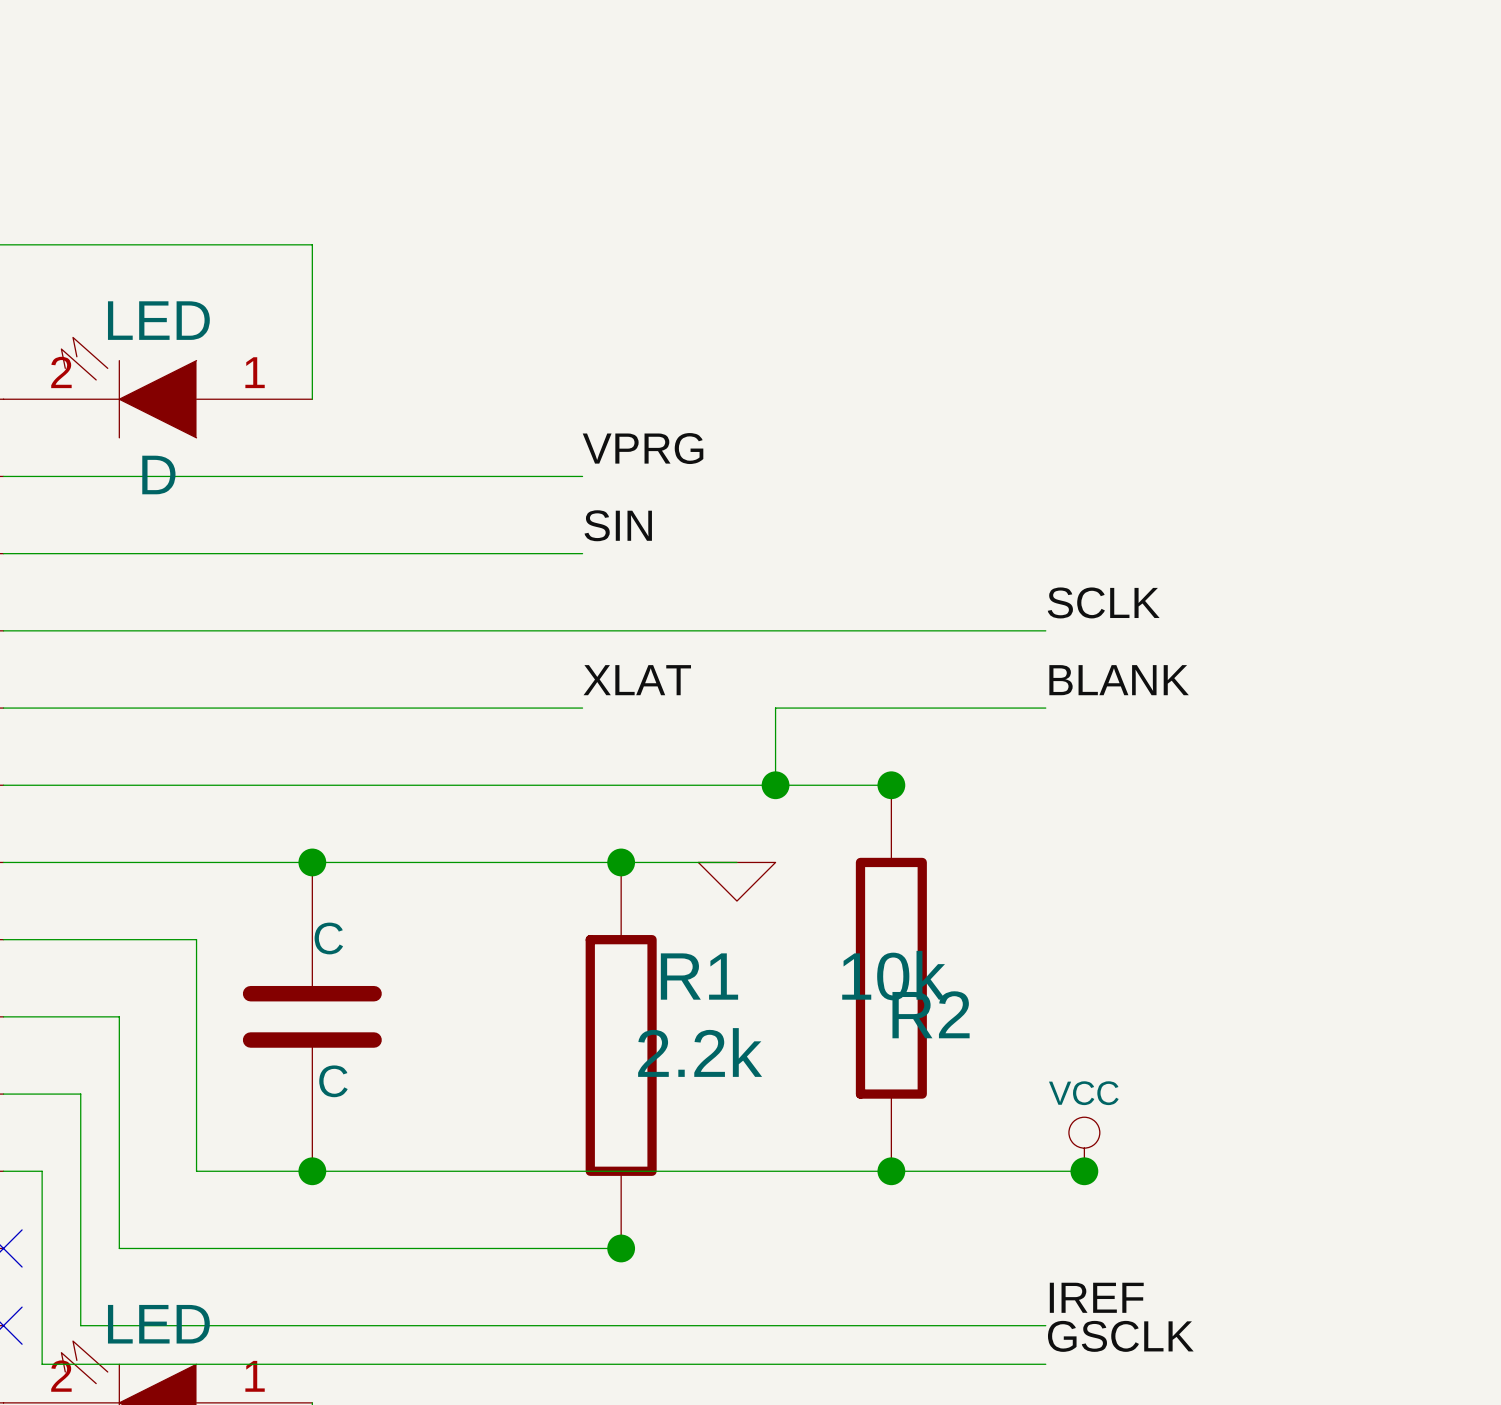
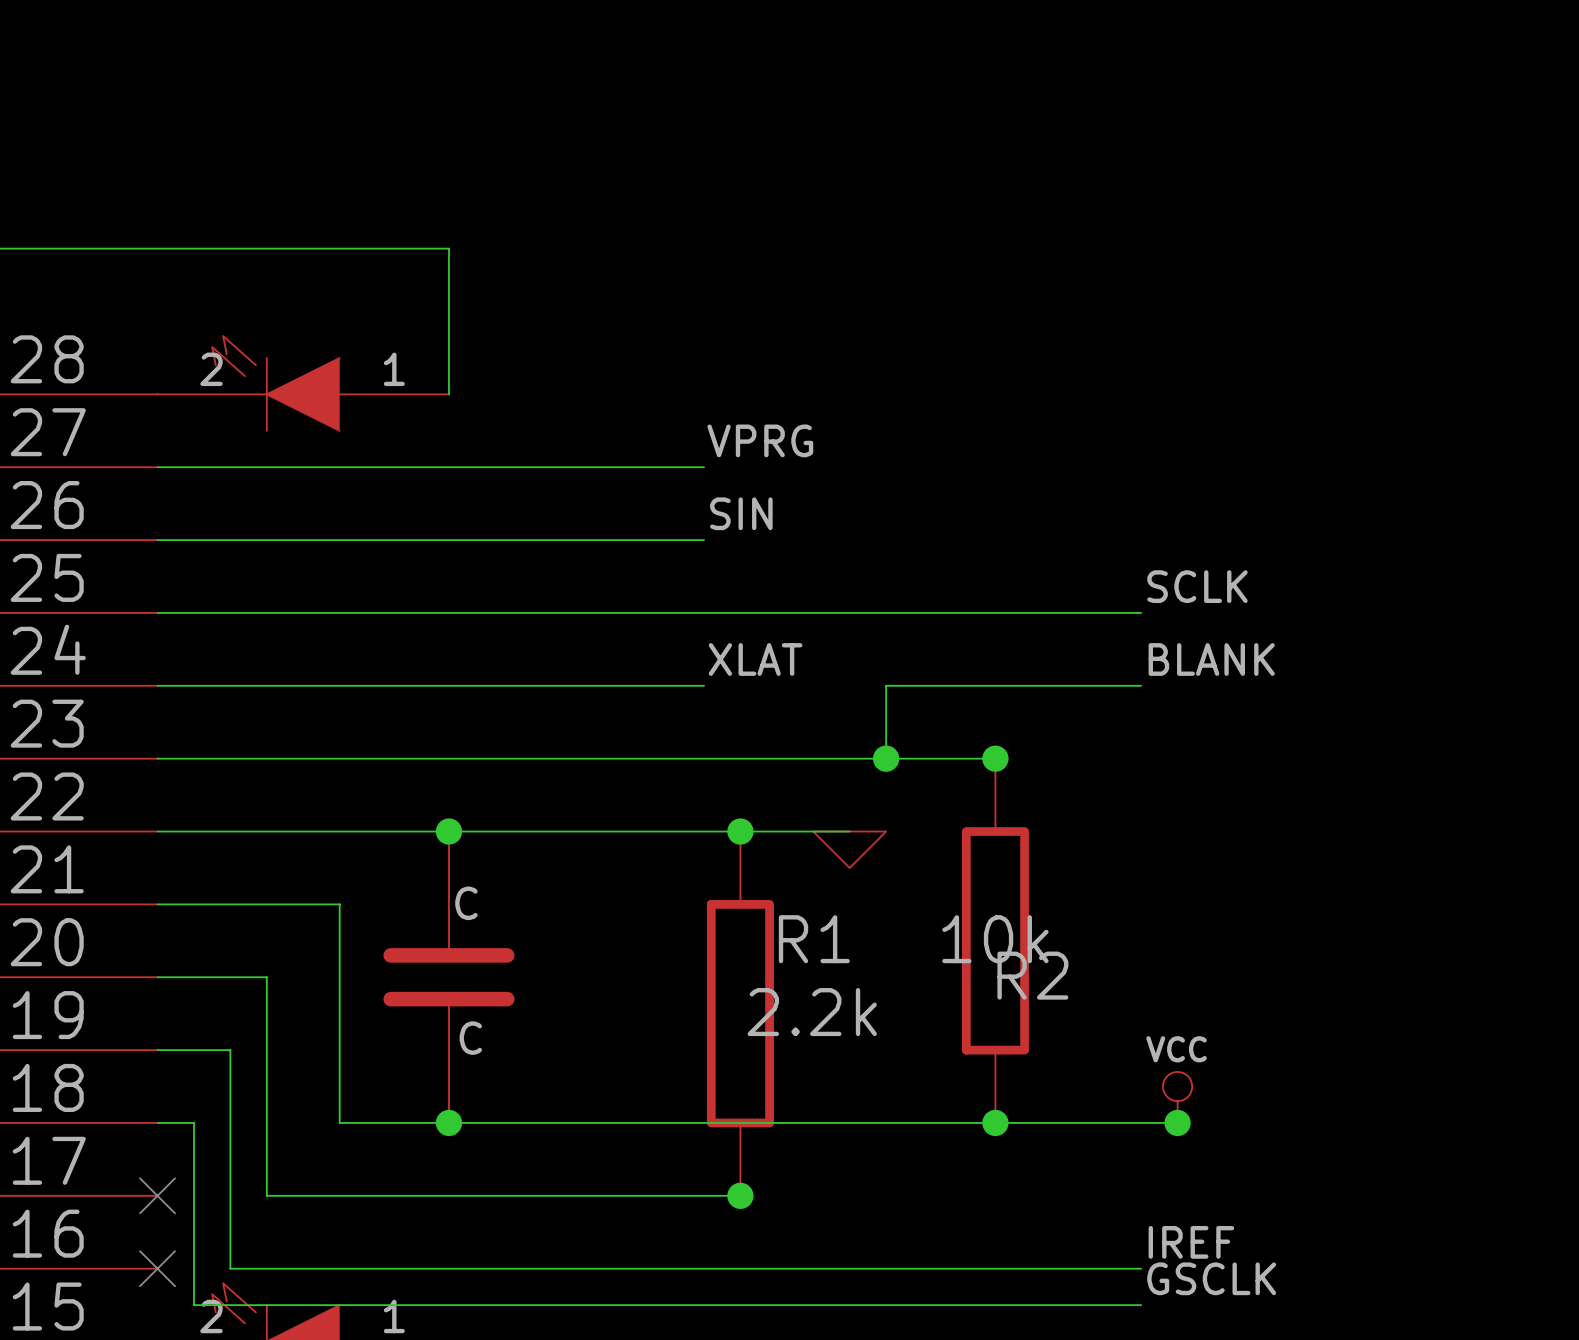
part text: LED (158, 320) -> none
part text: D (158, 475) -> none
part value: LED (158, 1324) -> none

